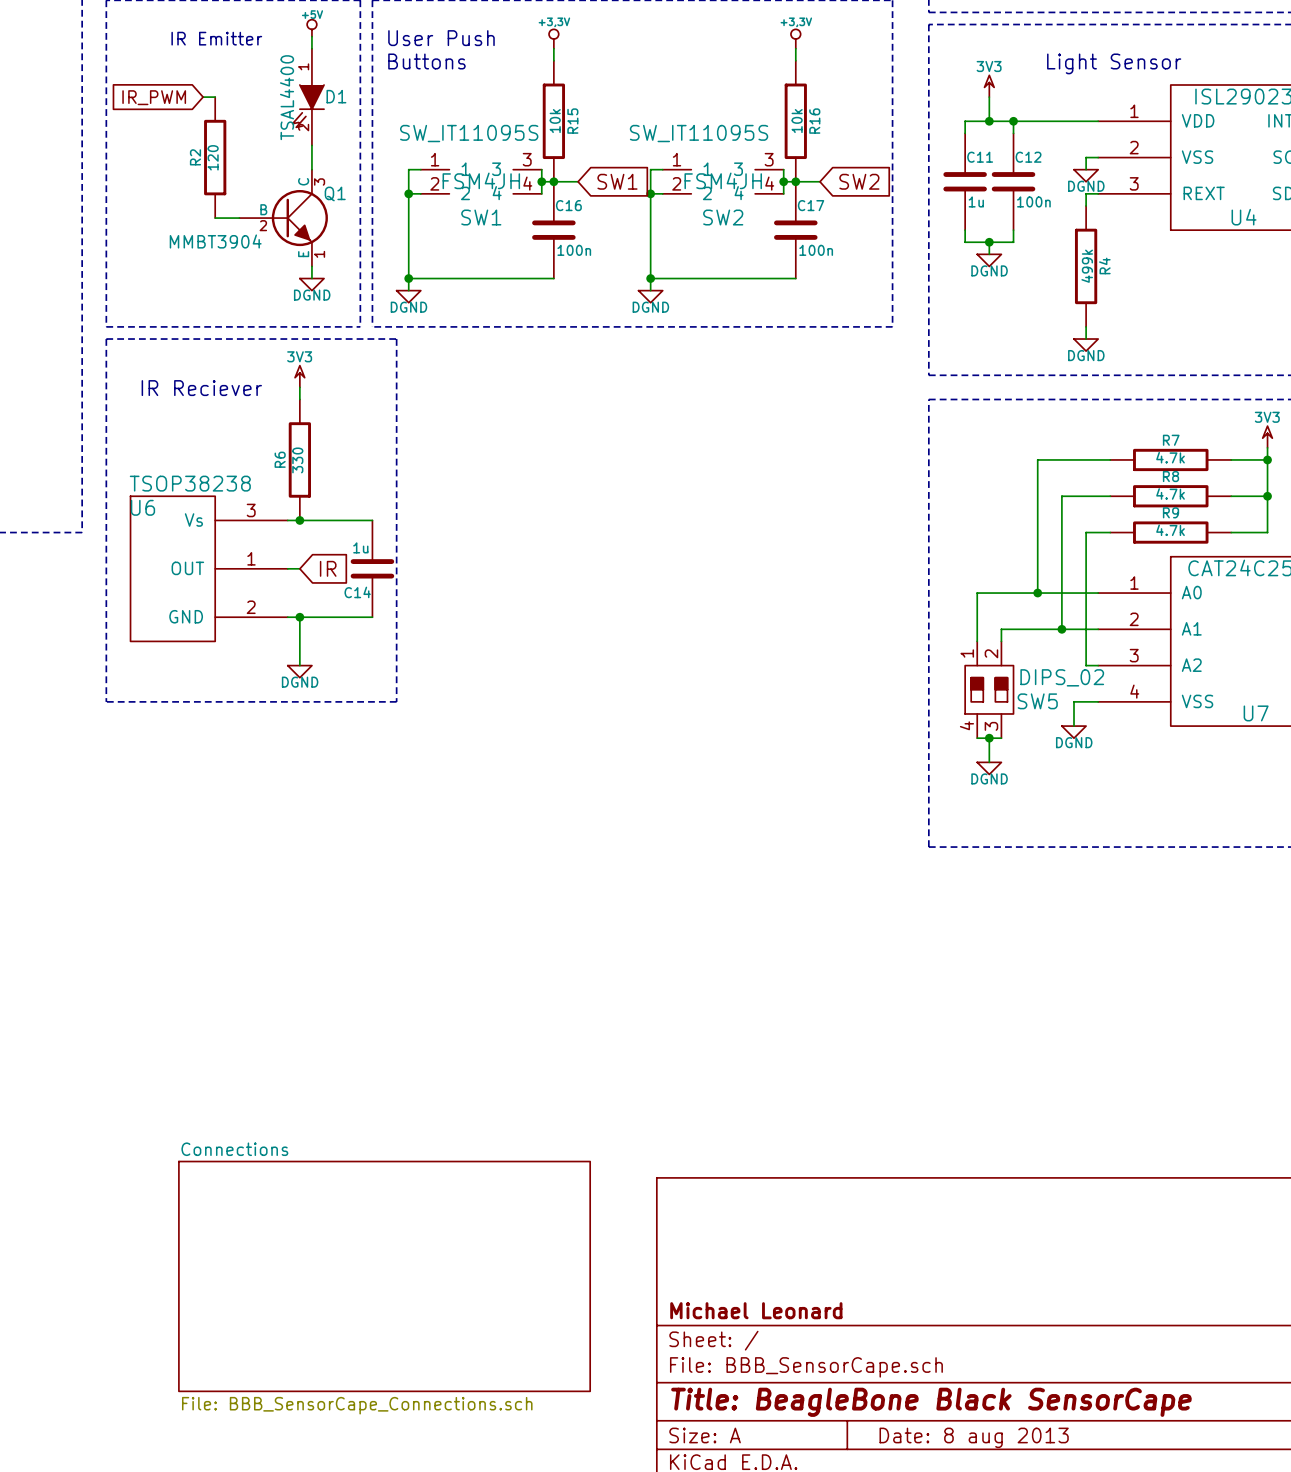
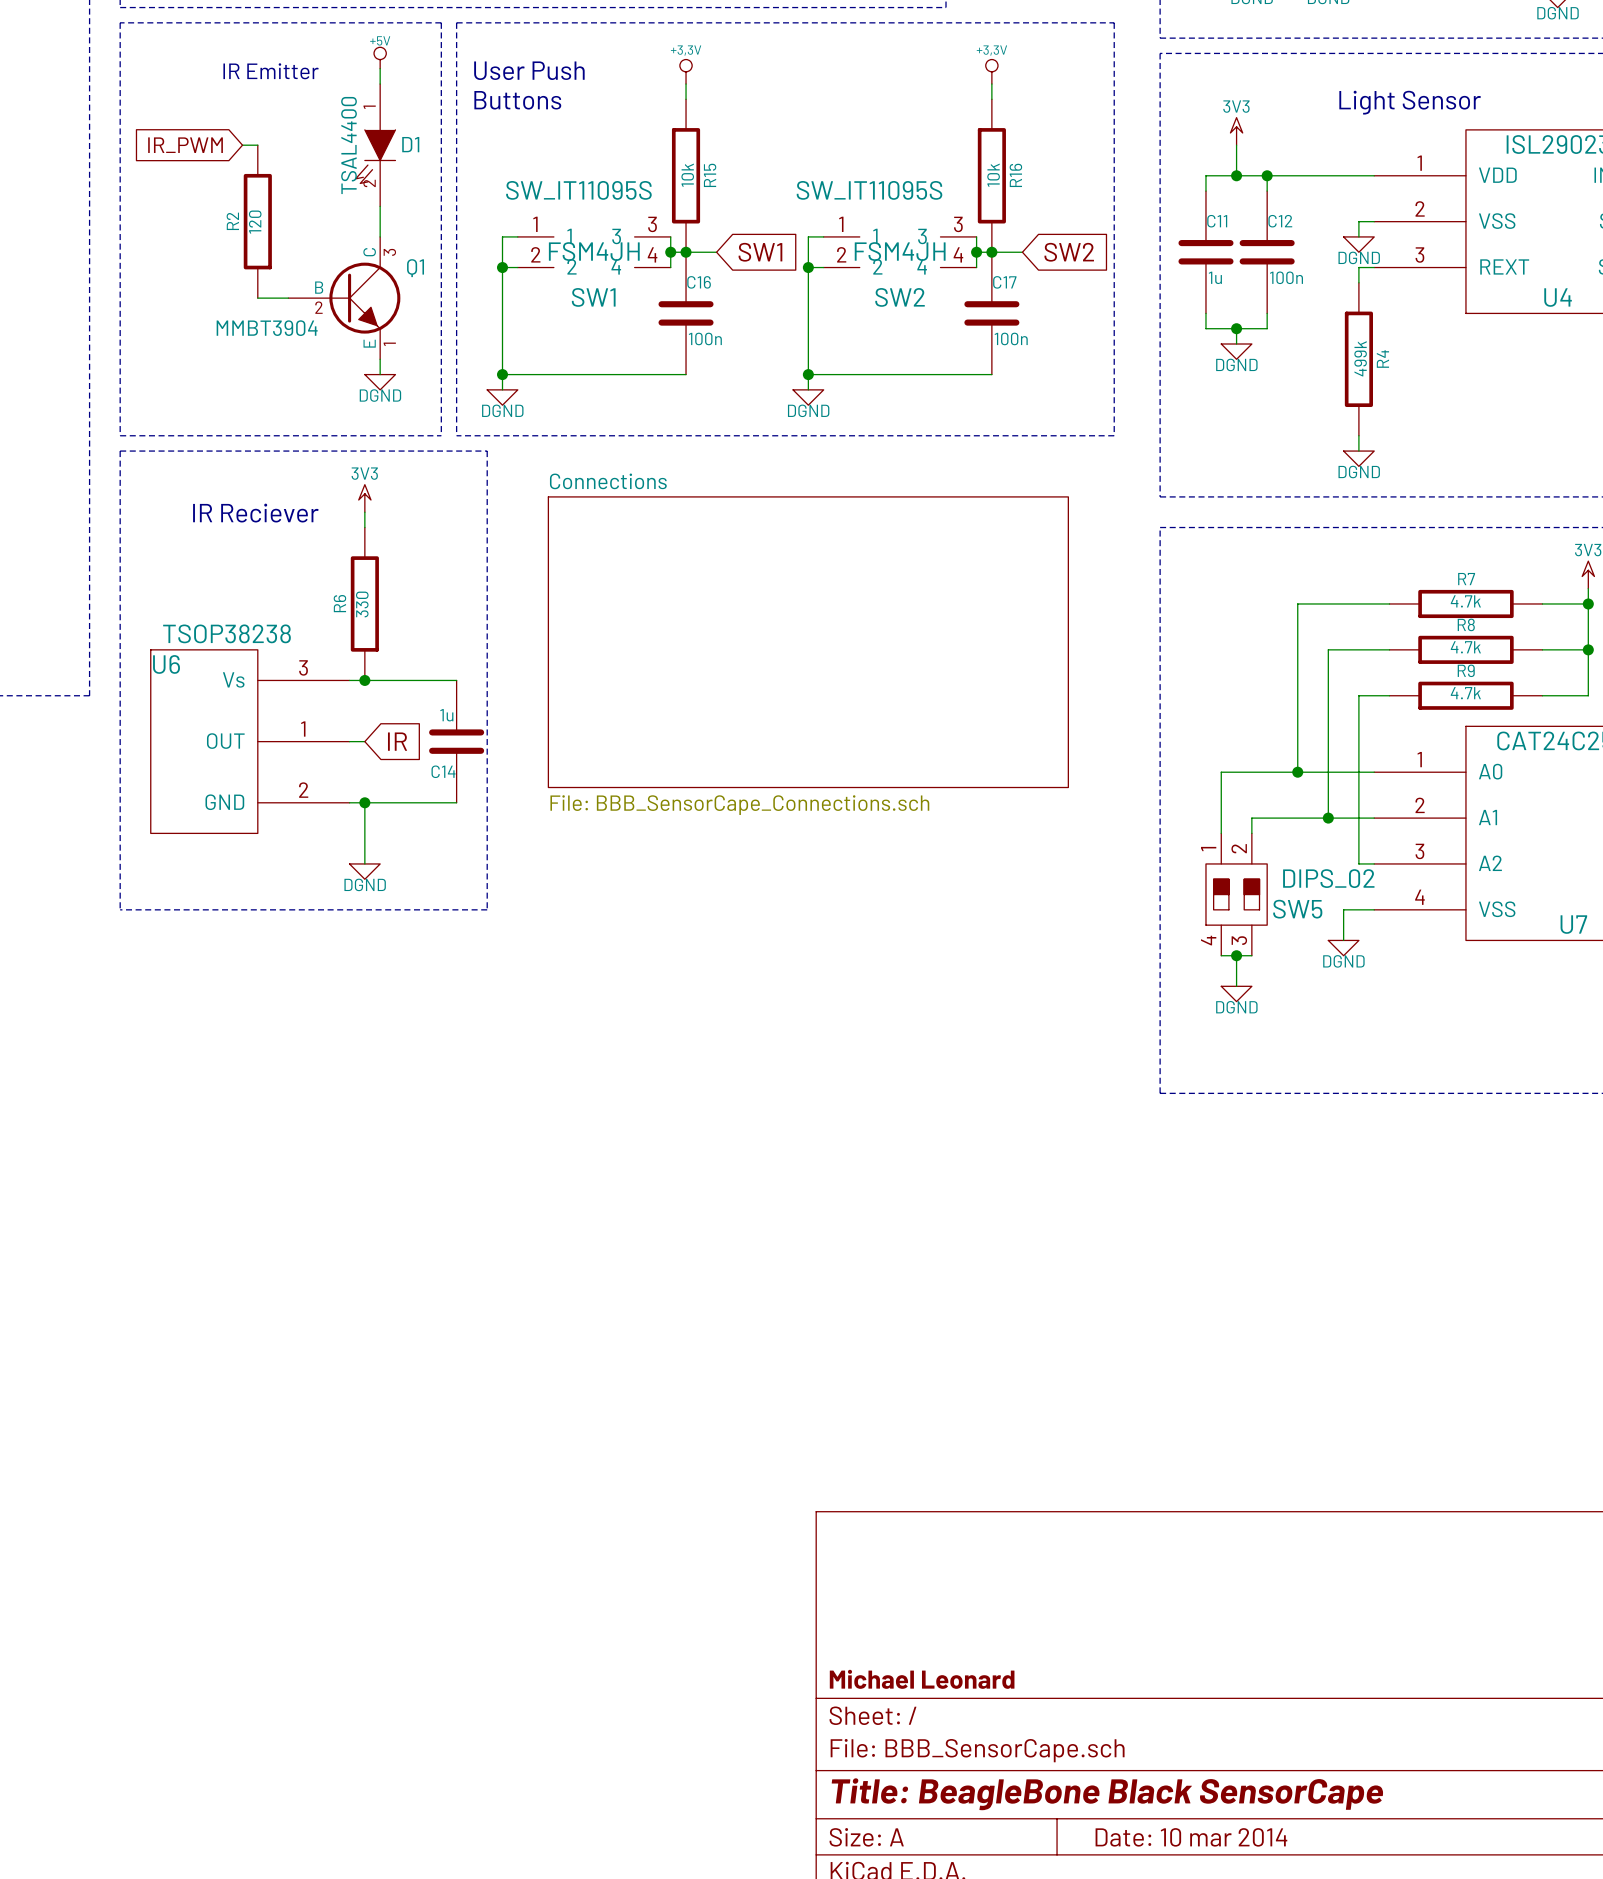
sheet Connections: none -> File: BBB_SensorCape_Connections.sch (808, 642)
sheet Connections: File: BBB_SensorCape_Connections.sch (384, 1276) -> none
title block: Date: 8 aug 2013 (974, 1437) -> Date: 10 mar 2014 (1191, 1837)

